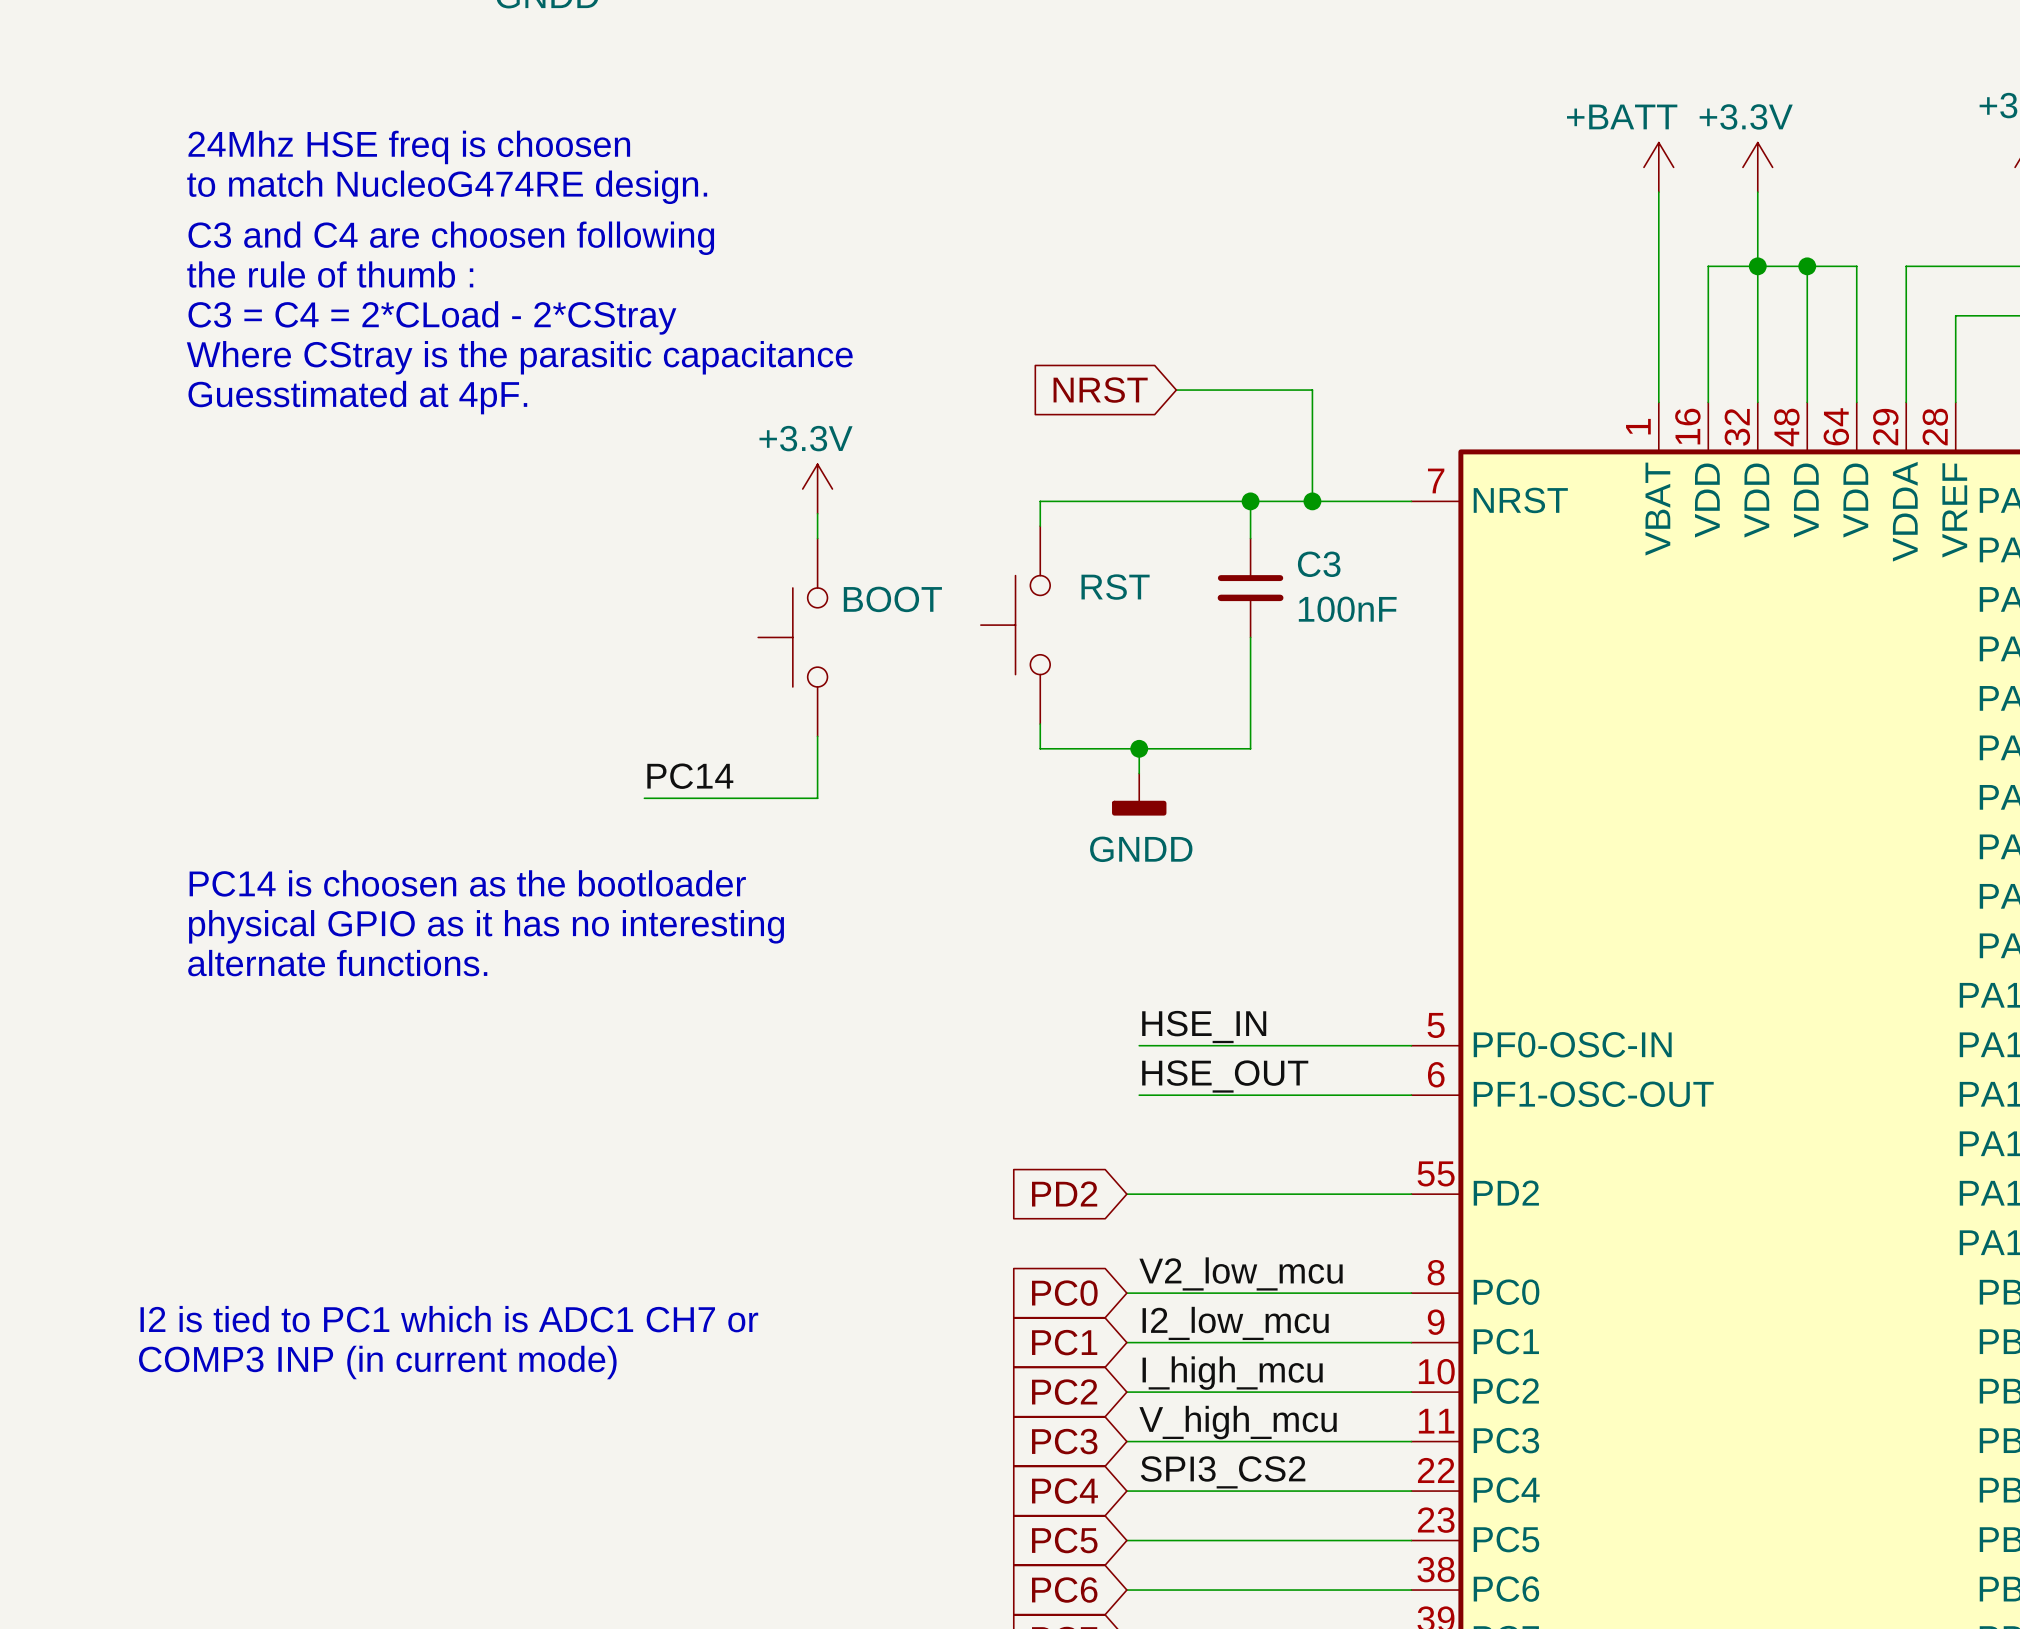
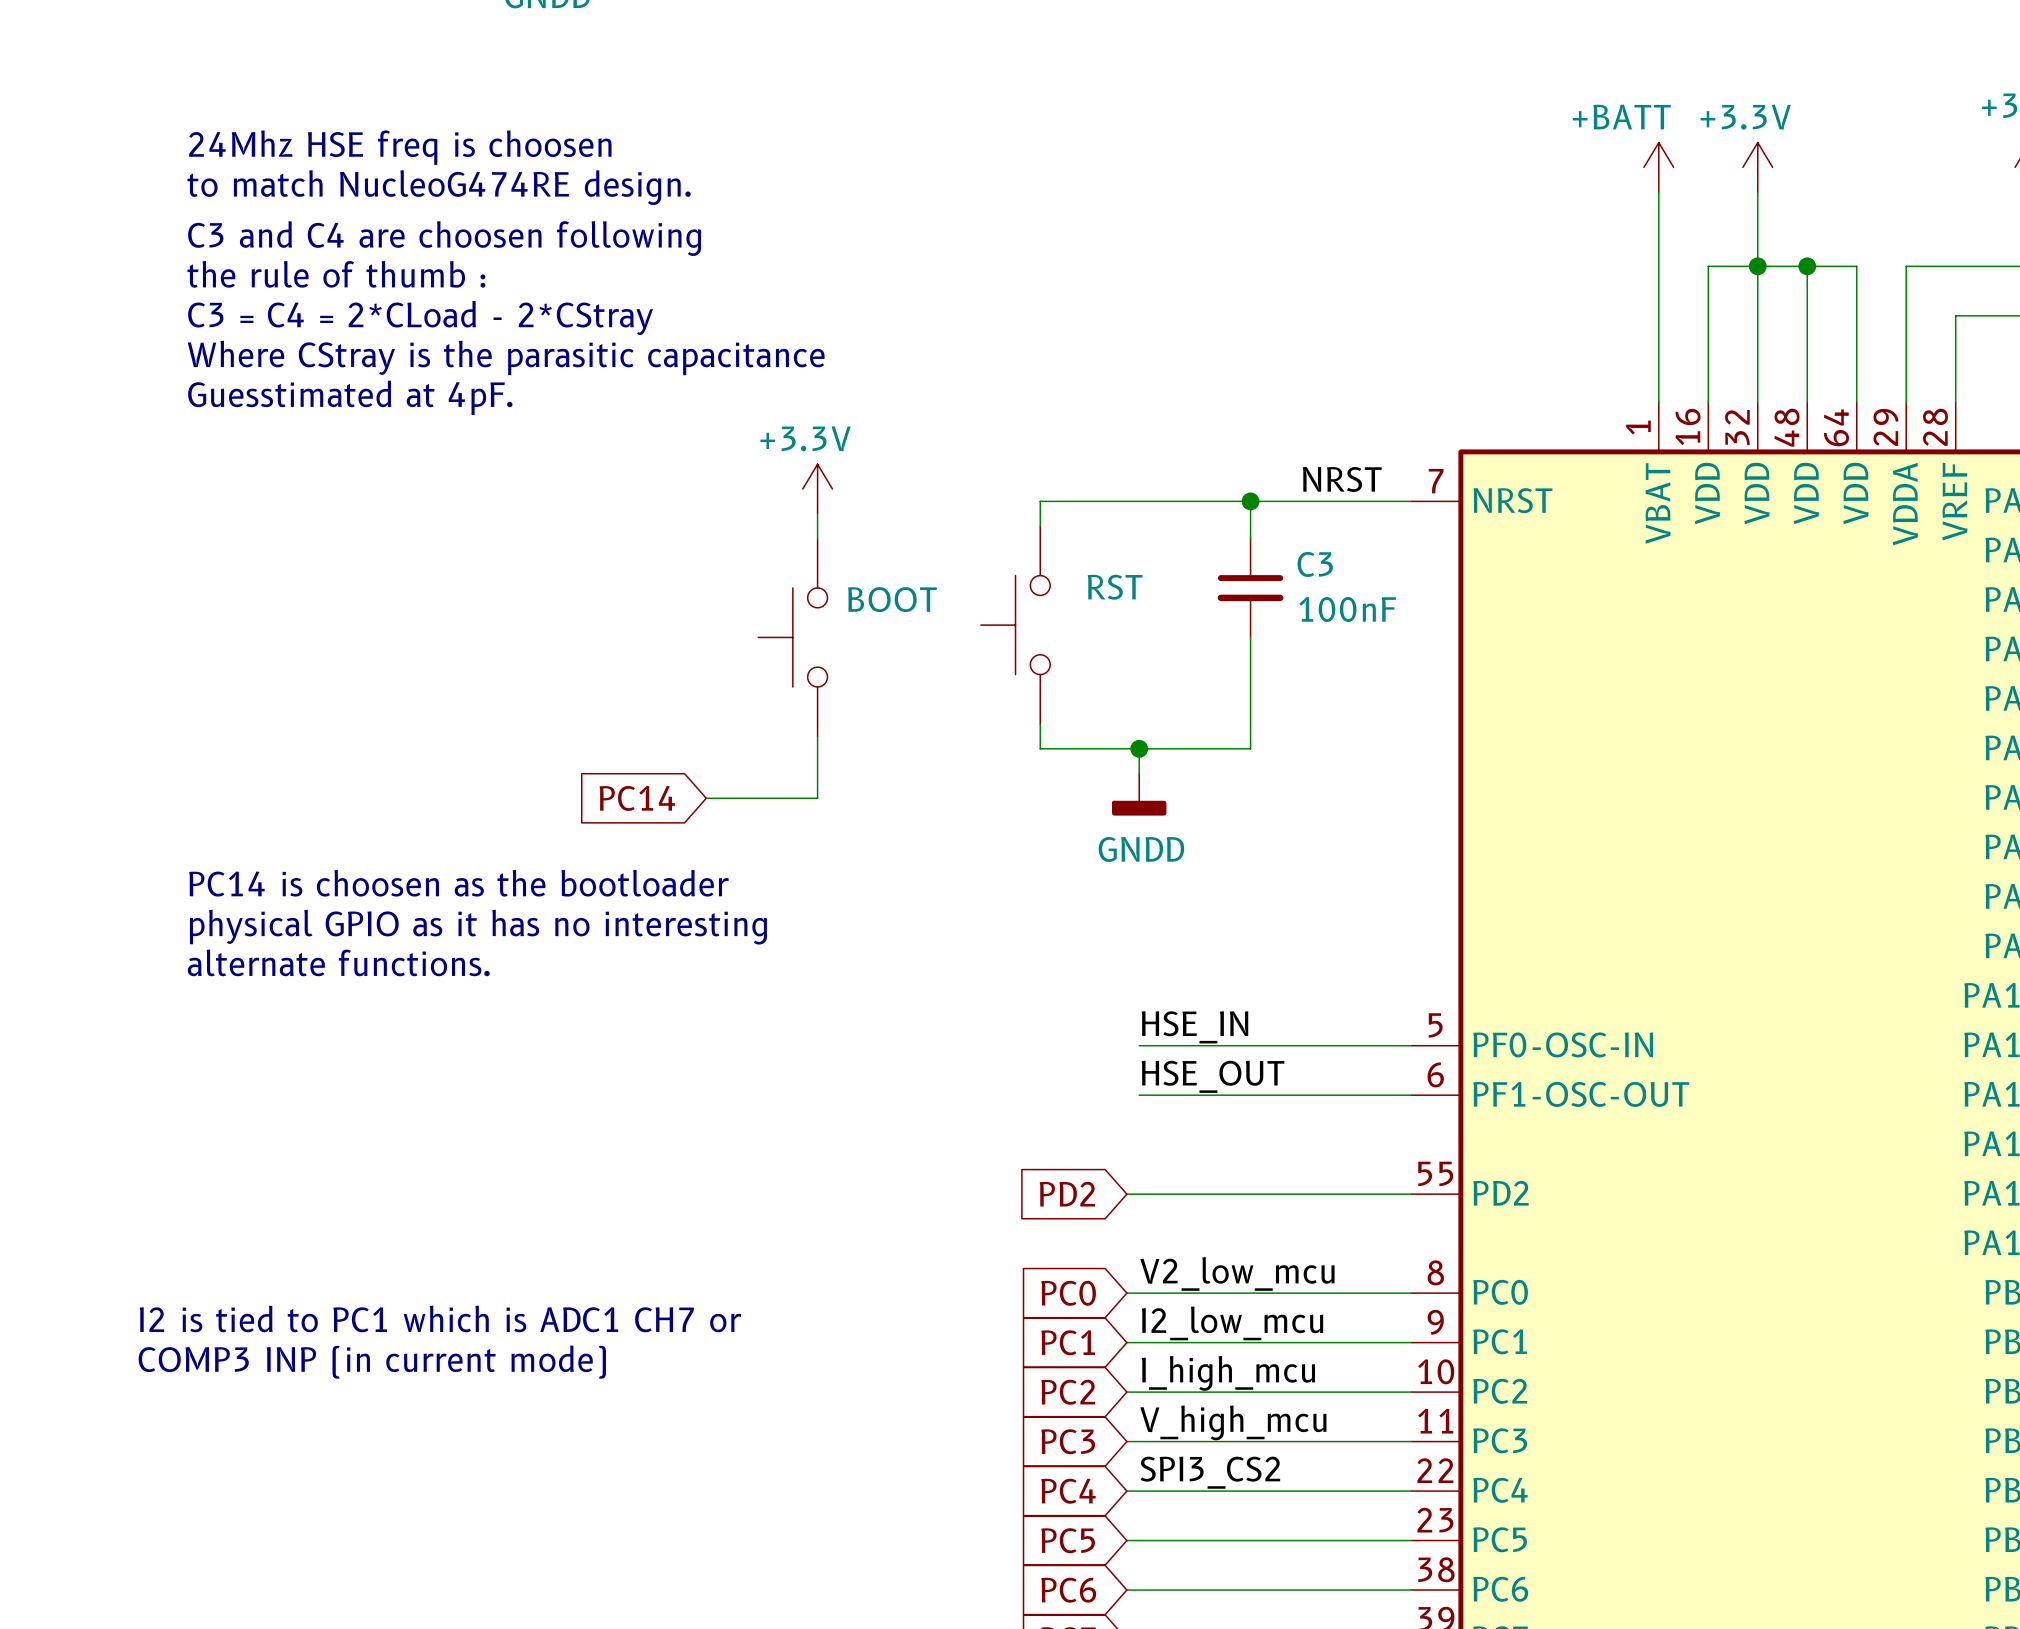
global label: NRST (1100, 390) -> none
wire: (1176, 390) (1312, 390) (1312, 501) -> none
label: none -> NRST (1342, 479)
junction: (1312, 501) -> none
label: PC14 (690, 776) -> none
global label: none -> PC14 (637, 798)
wire: (644, 798) (706, 798) -> none

